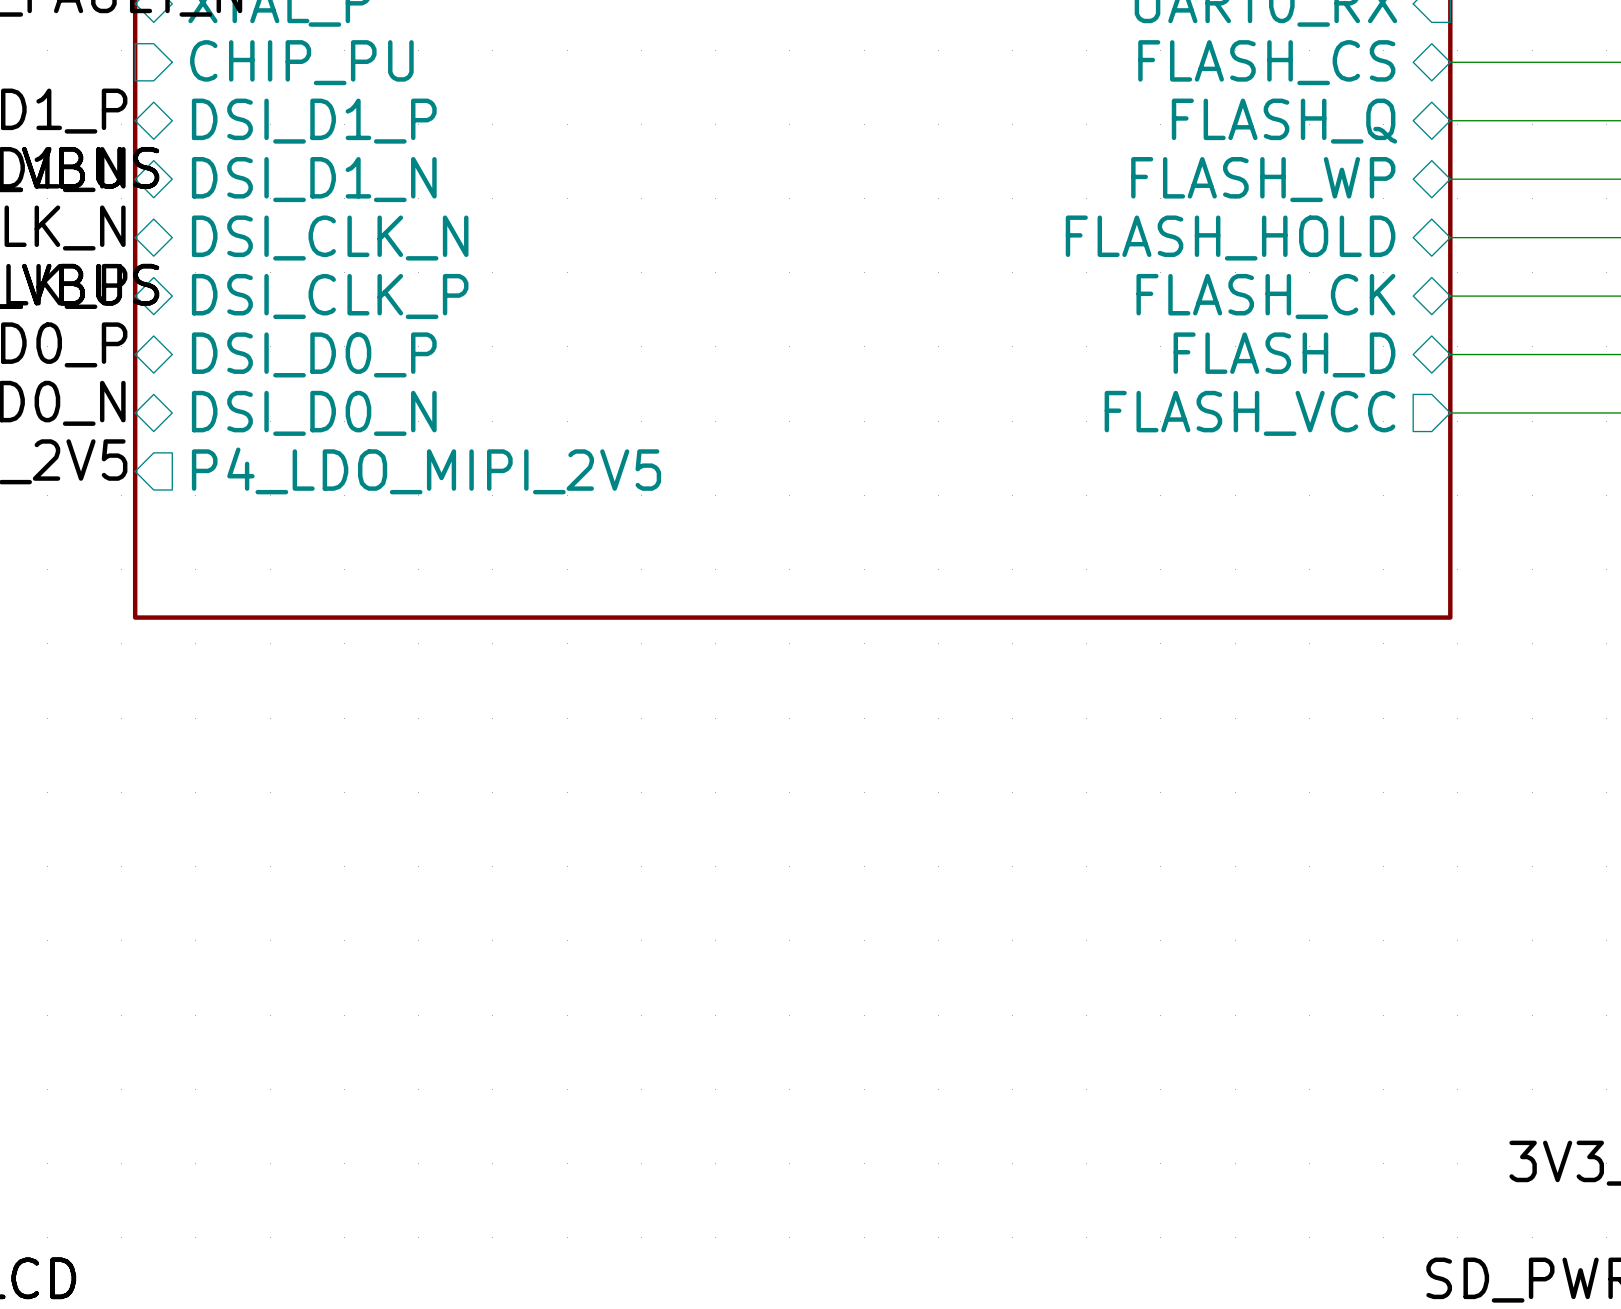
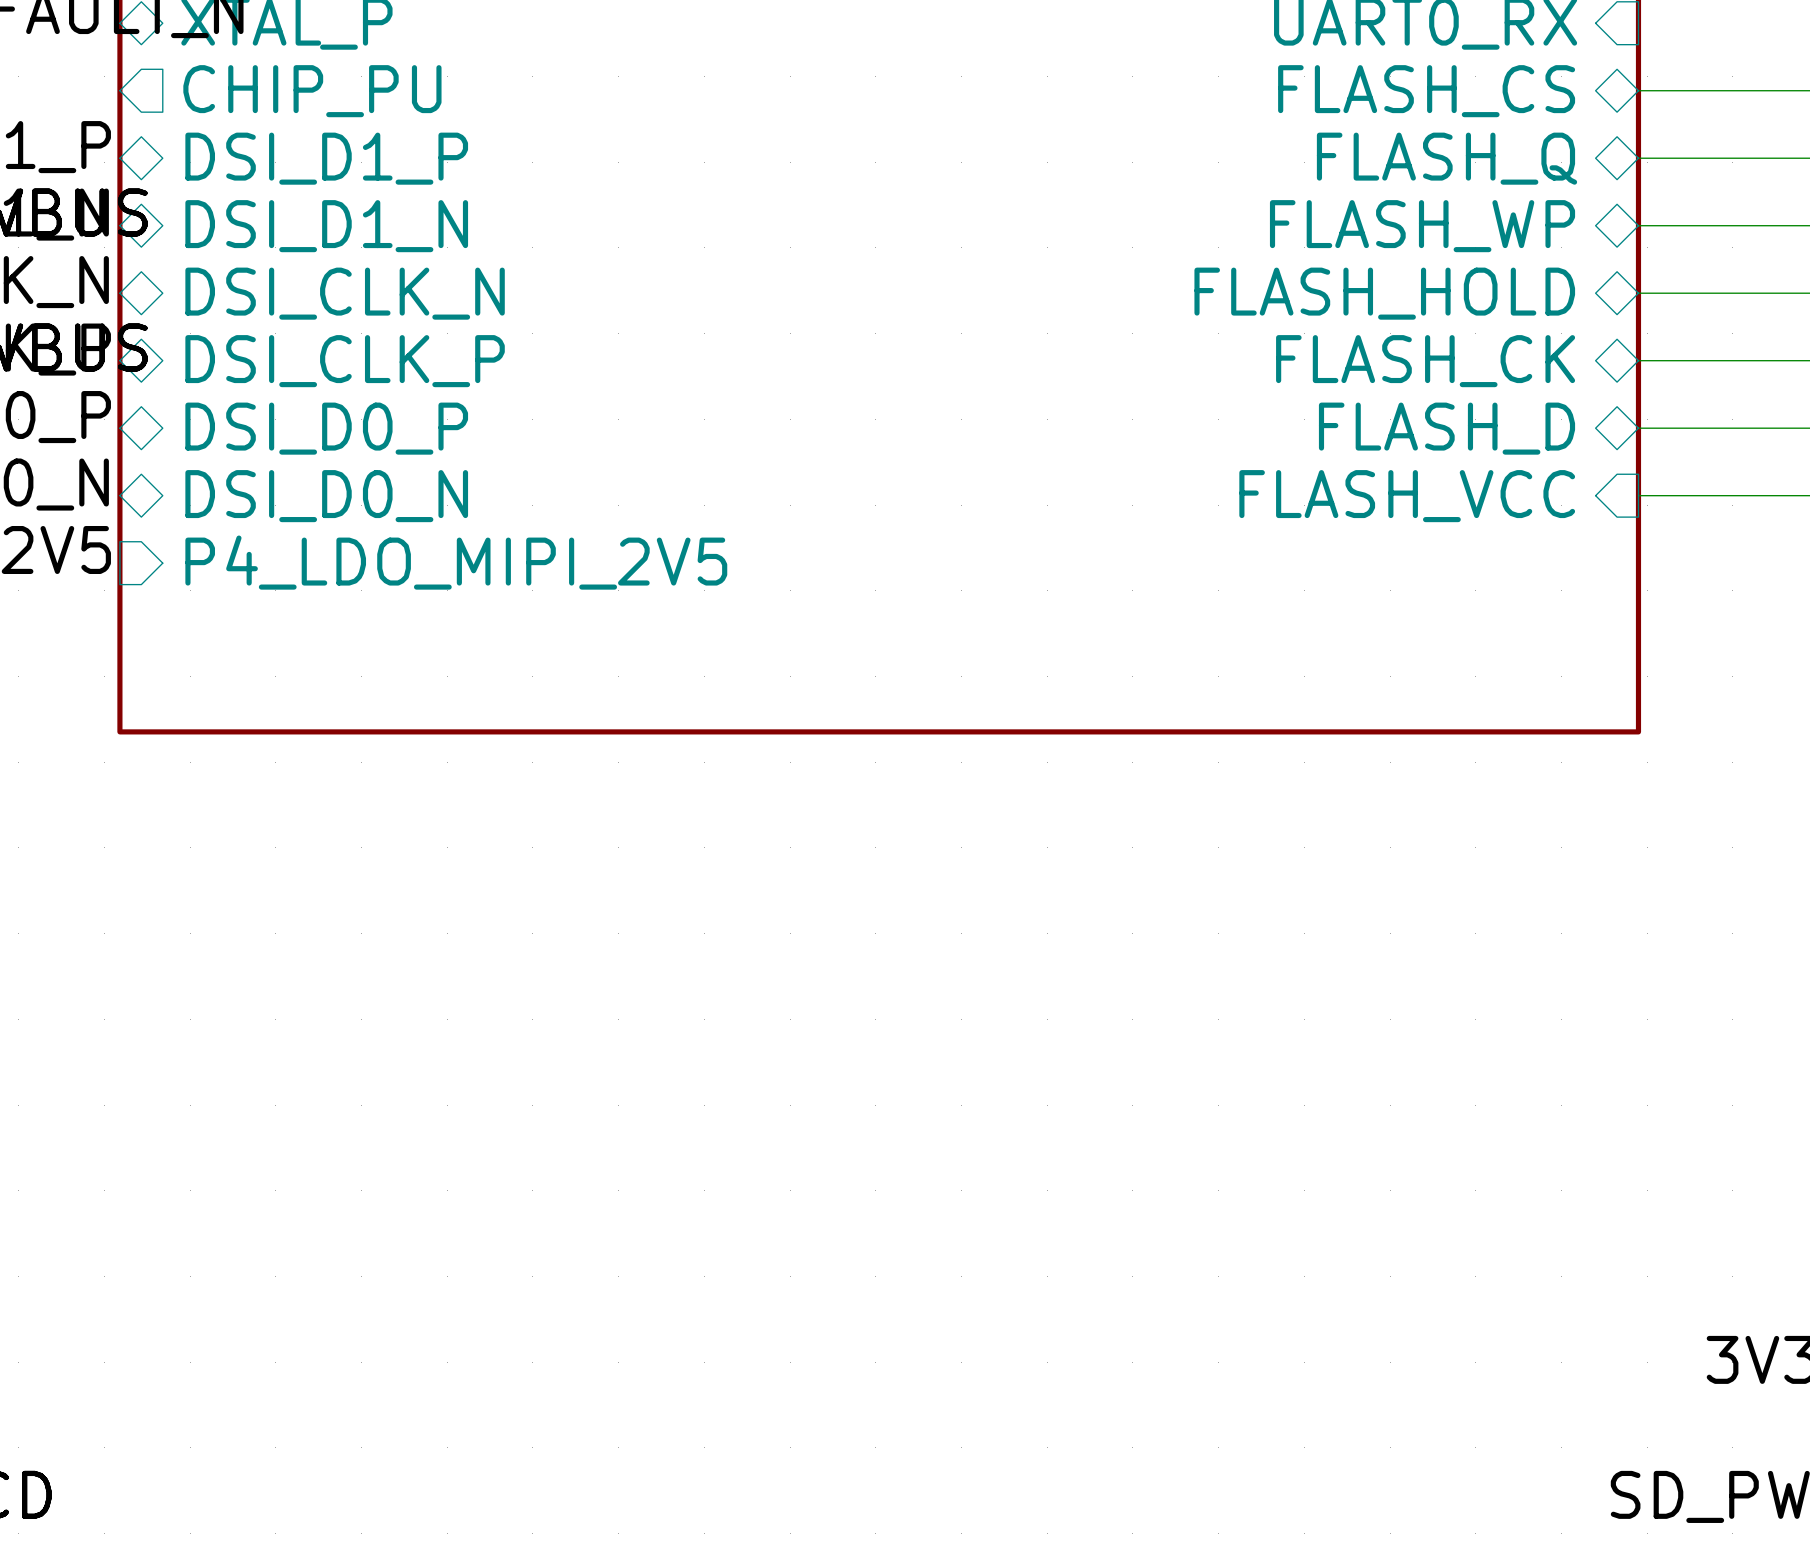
sheet pin shape: input (301, 62) -> output (312, 91)
sheet pin shape: output (1250, 413) -> input (1407, 496)
sheet pin shape: output (426, 470) -> input (456, 562)

